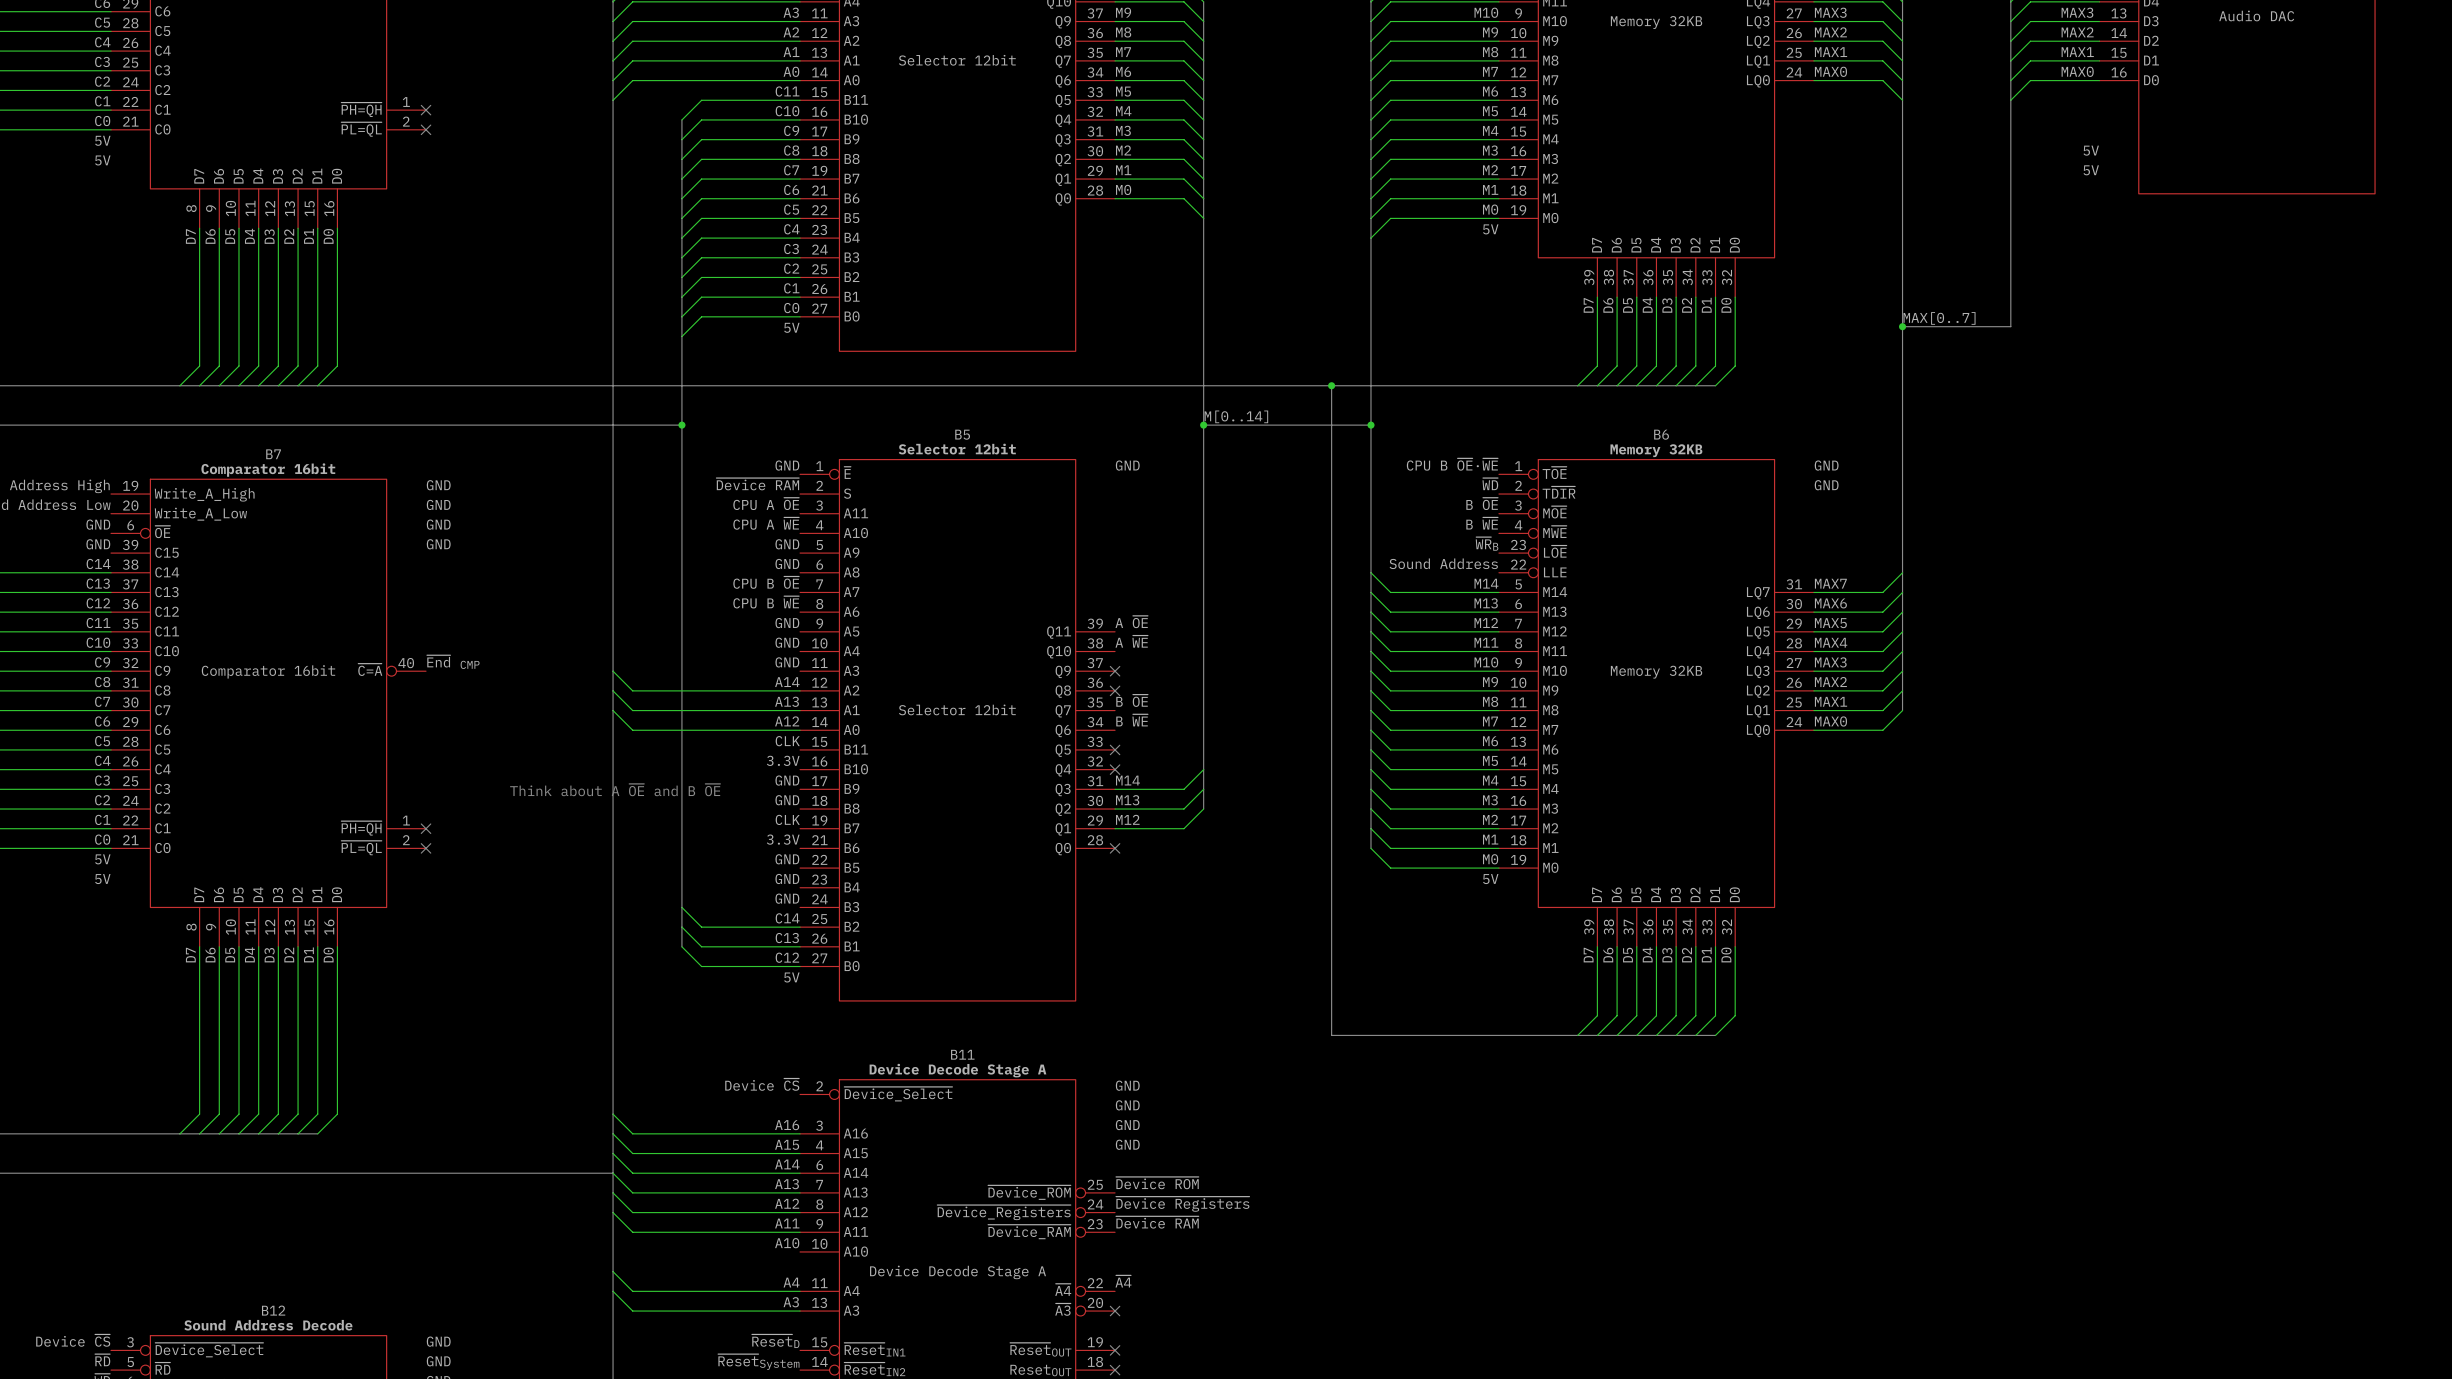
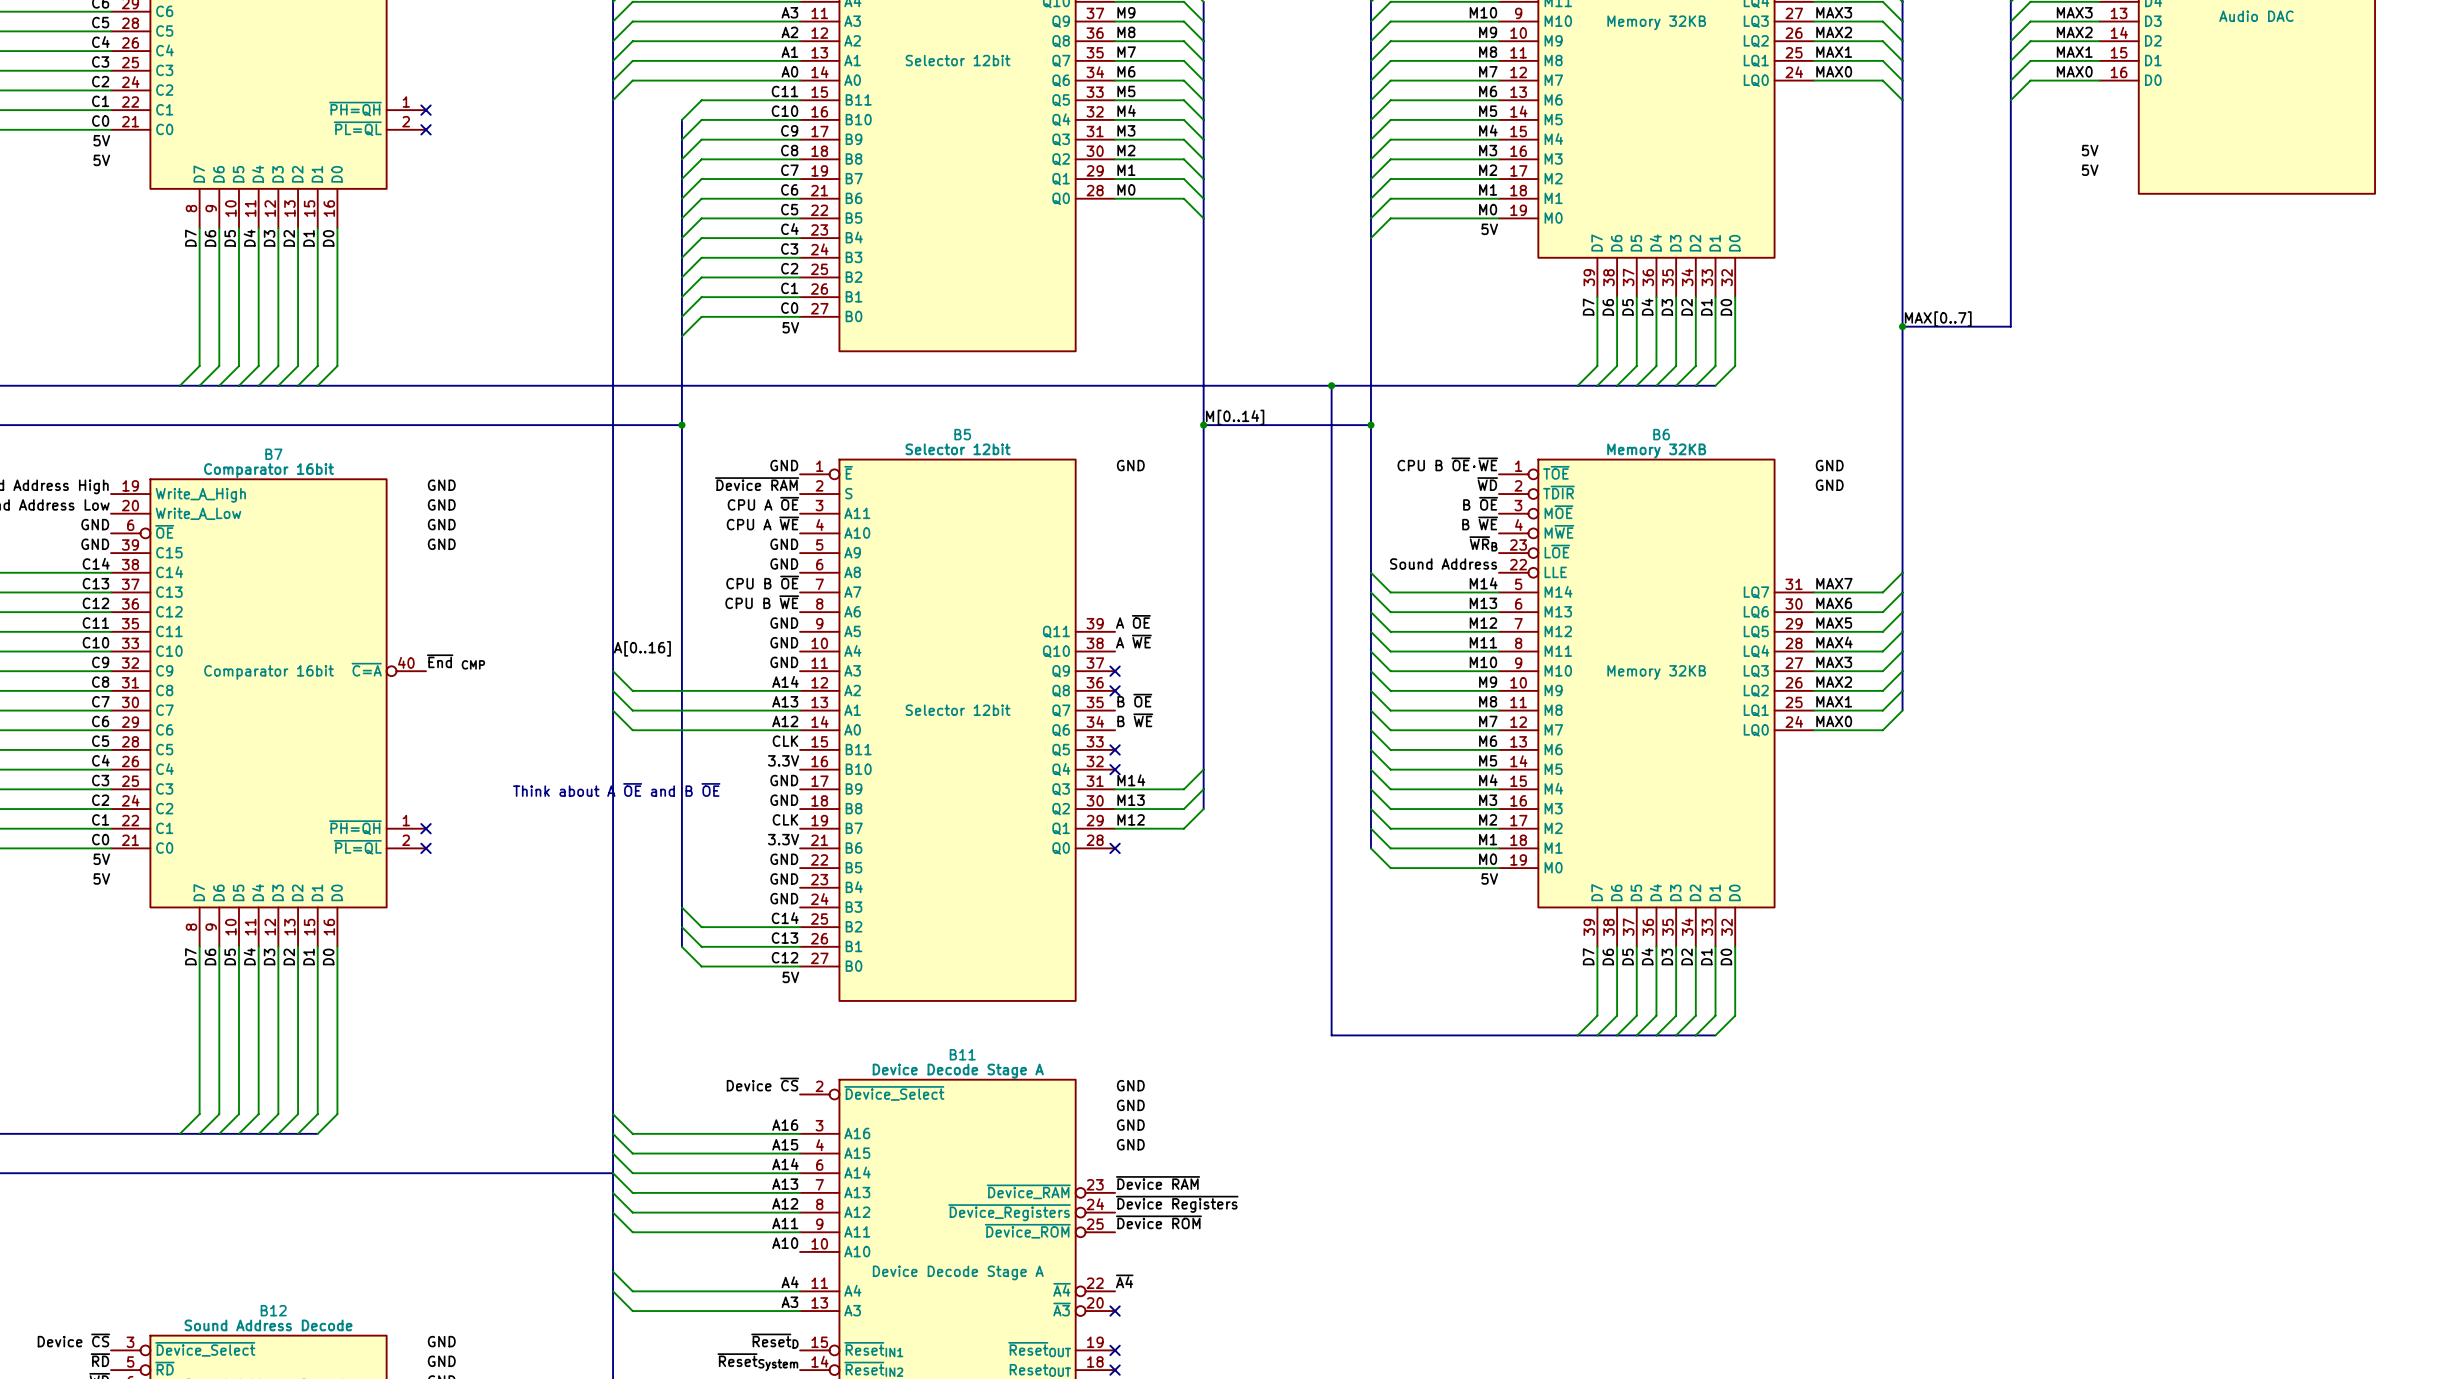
label: none -> A[0..16] (642, 648)
label: ~{Device ROM} (1157, 1183) -> ~{Device RAM} (1158, 1182)
B11 pin number: 25 (1095, 1184) -> 23 (1095, 1184)
B11 pin name: ~{Device_ROM} (1029, 1192) -> ~{Device_RAM} (1028, 1191)
label: ~{Device RAM} (1157, 1222) -> ~{Device ROM} (1158, 1222)
B11 pin number: 23 (1095, 1224) -> 25 (1095, 1224)
B11 pin name: ~{Device_RAM} (1029, 1231) -> ~{Device_ROM} (1027, 1231)

